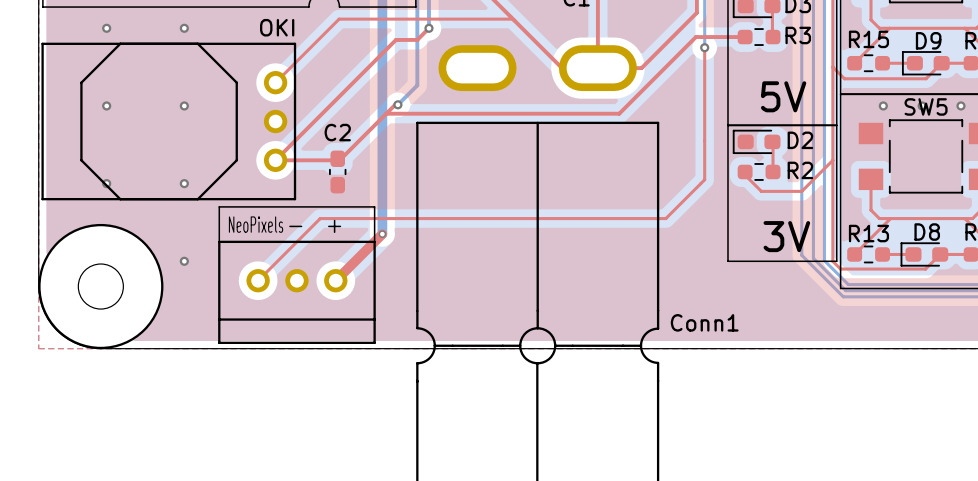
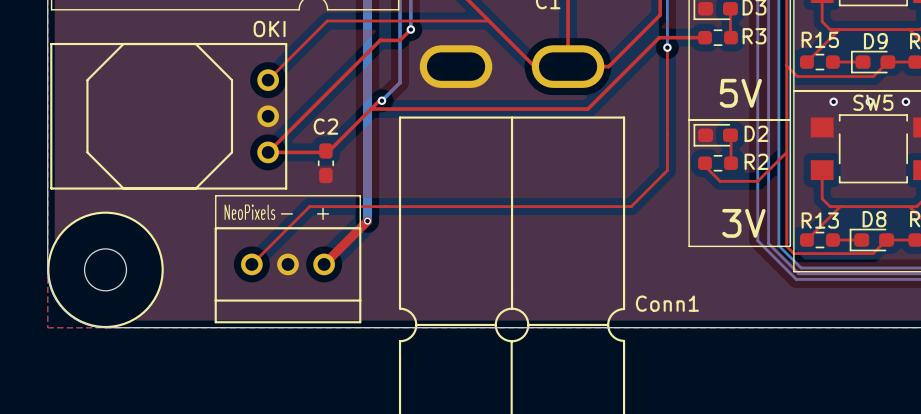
via: (106, 28) -> none
via: (184, 28) -> none
via: (106, 105) -> none
via: (184, 105) -> none
via: (106, 183) -> none
via: (184, 183) -> none
via: (184, 261) -> none

